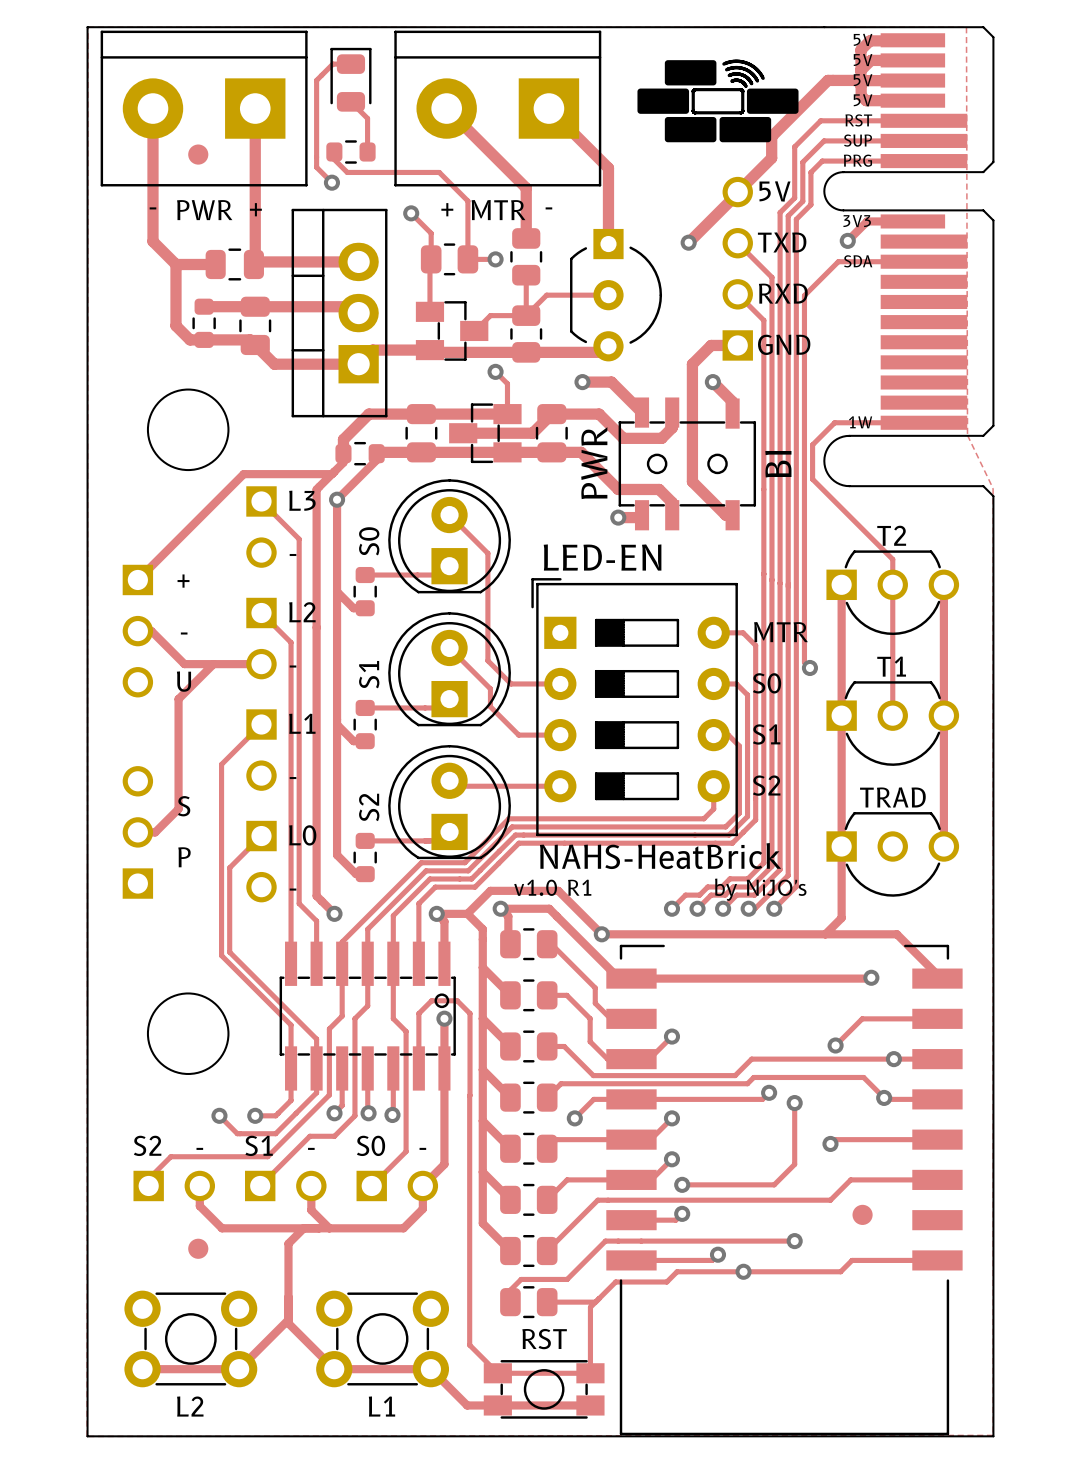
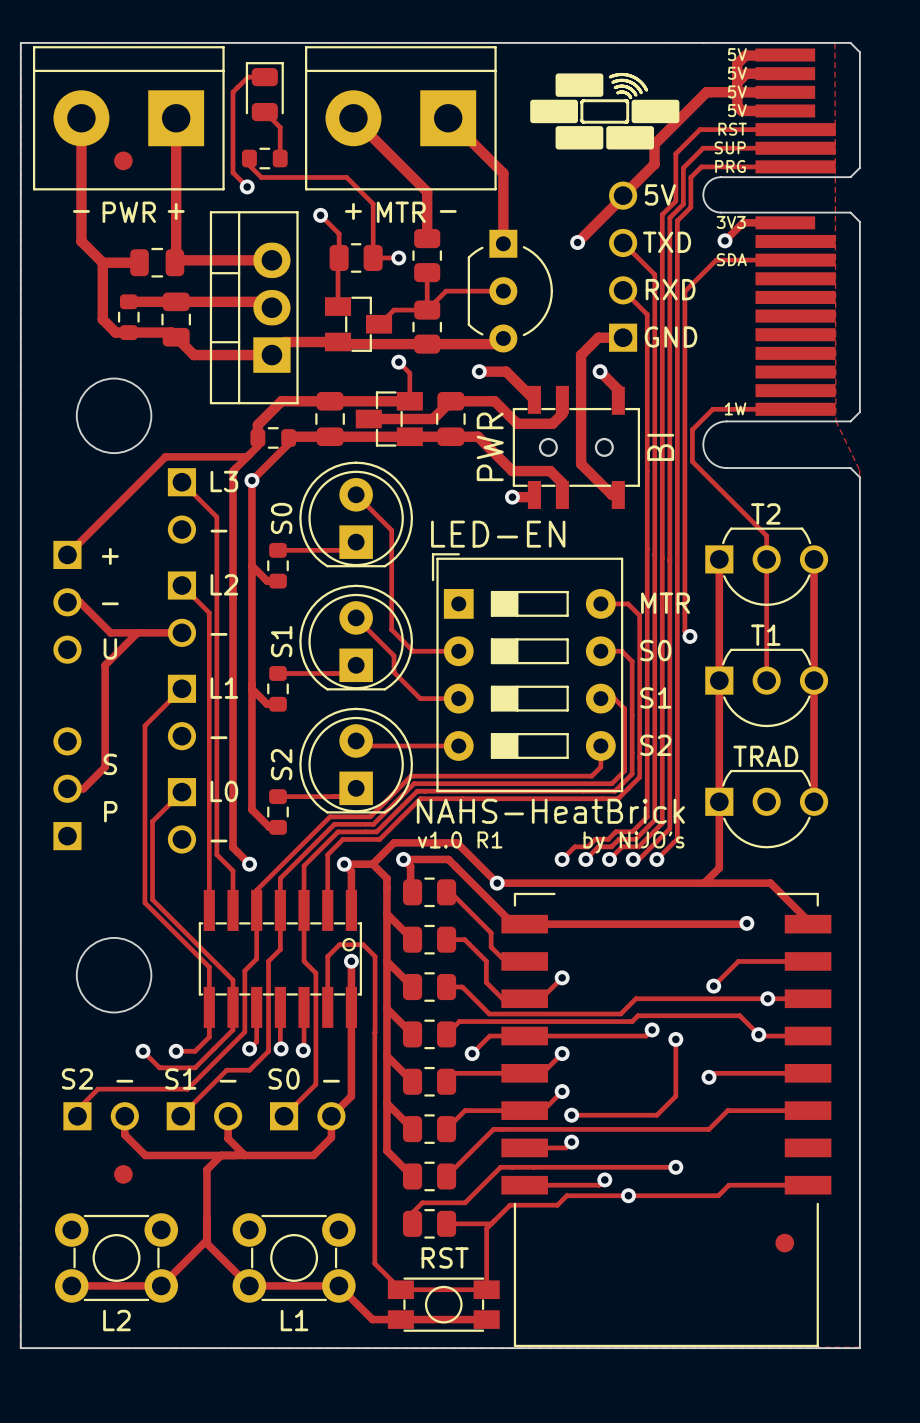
part position: (862, 1214) -> (784, 1243)

